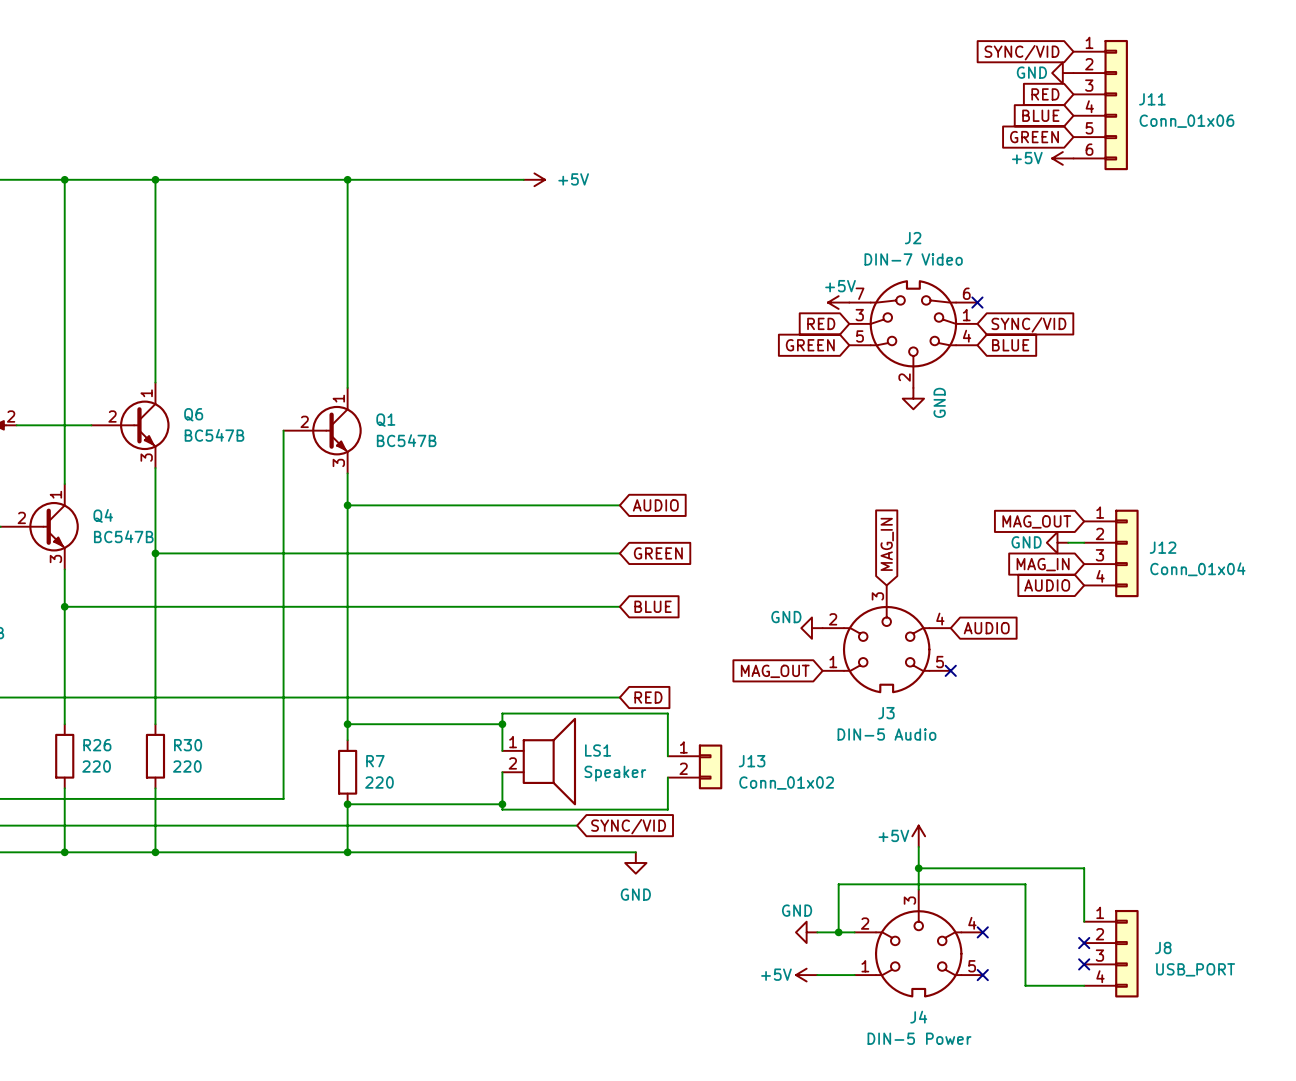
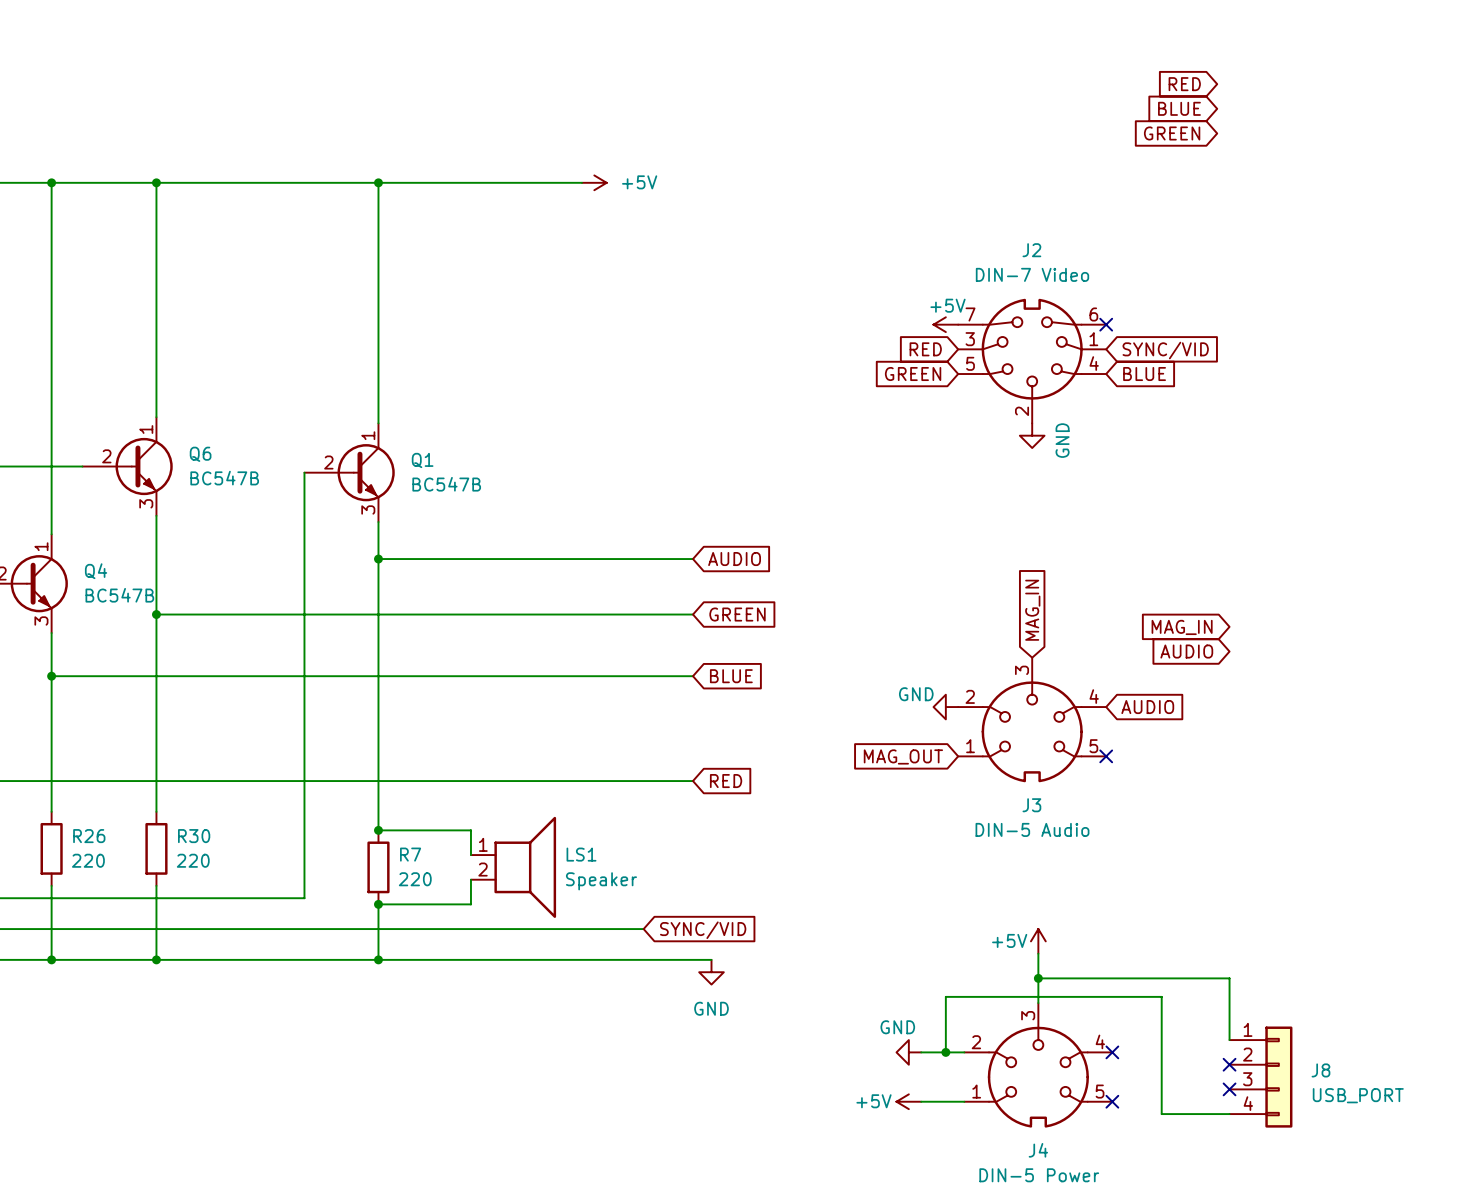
global label: SYNC/VID (1022, 52) -> none
power symbol: GND (1062, 73) -> none
J11: Conn_01x06 (1100, 105) -> none
power symbol: +5V (1062, 158) -> none
global label: MAG_OUT (1036, 521) -> none
power symbol: GND (1057, 542) -> none
wire: (1068, 542) (1084, 542) -> none
global label position: MAG_IN (887, 544) -> MAG_IN (1032, 610)
J12: Conn_01x04 (1111, 553) -> none
power symbol position: GND (811, 628) -> GND (945, 707)
global label position: AUDIO (986, 628) -> AUDIO (1147, 707)
J3 position: (886, 639) -> (1032, 719)
no-connect mark position: (950, 670) -> (1106, 756)
global label position: MAG_OUT (775, 671) -> MAG_OUT (903, 756)
wire: (347, 724) (502, 724) -> none
junction position: (347, 724) -> (378, 830)
junction: (502, 724) -> none
wire: none -> (378, 830) (470, 830) (470, 855)
wire: (502, 750) (502, 713) (667, 713) (667, 756) -> none
LS1 position: (539, 761) -> (513, 867)
J13: Conn_01x02 (695, 766) -> none
wire: (502, 772) (502, 809) (667, 809) (667, 777) -> none
wire: (427, 804) (502, 804) -> (470, 904) (470, 879)
junction: (502, 804) -> none

